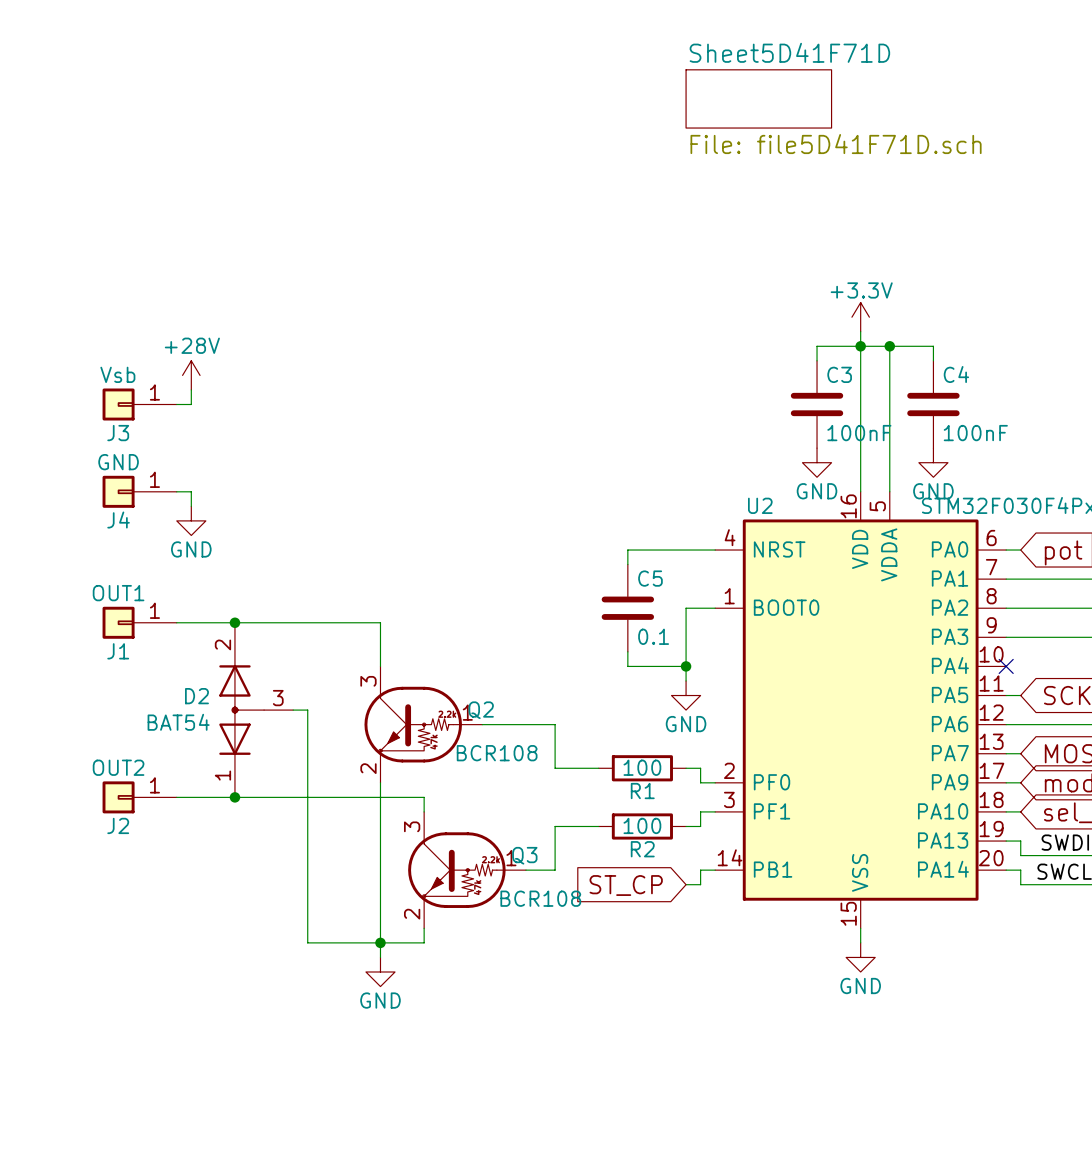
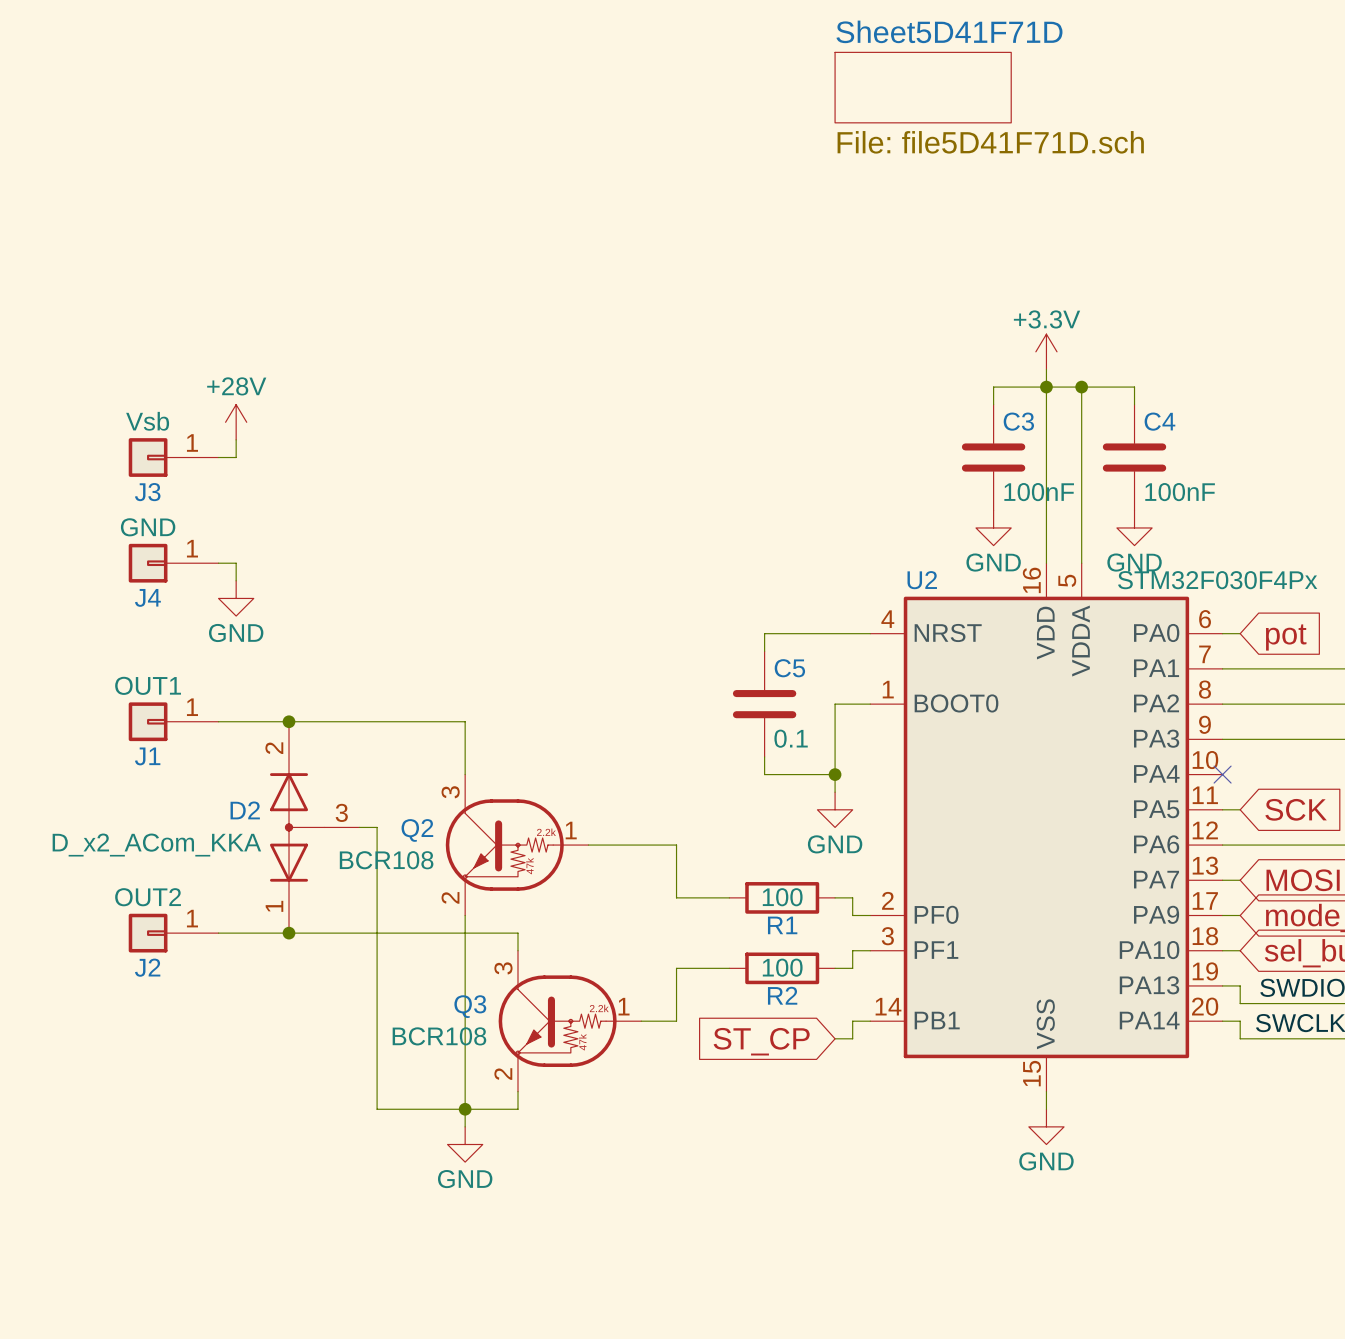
Q2 name position: Q2 (481, 710) -> Q2 (417, 830)
D2 value: BAT54 (178, 722) -> D_x2_ACom_KKA (156, 845)
Q2 value position: BCR108 (497, 753) -> BCR108 (386, 860)
Q3 name position: Q3 (524, 855) -> Q3 (470, 1006)
Q3 value position: BCR108 (540, 898) -> BCR108 (439, 1036)

